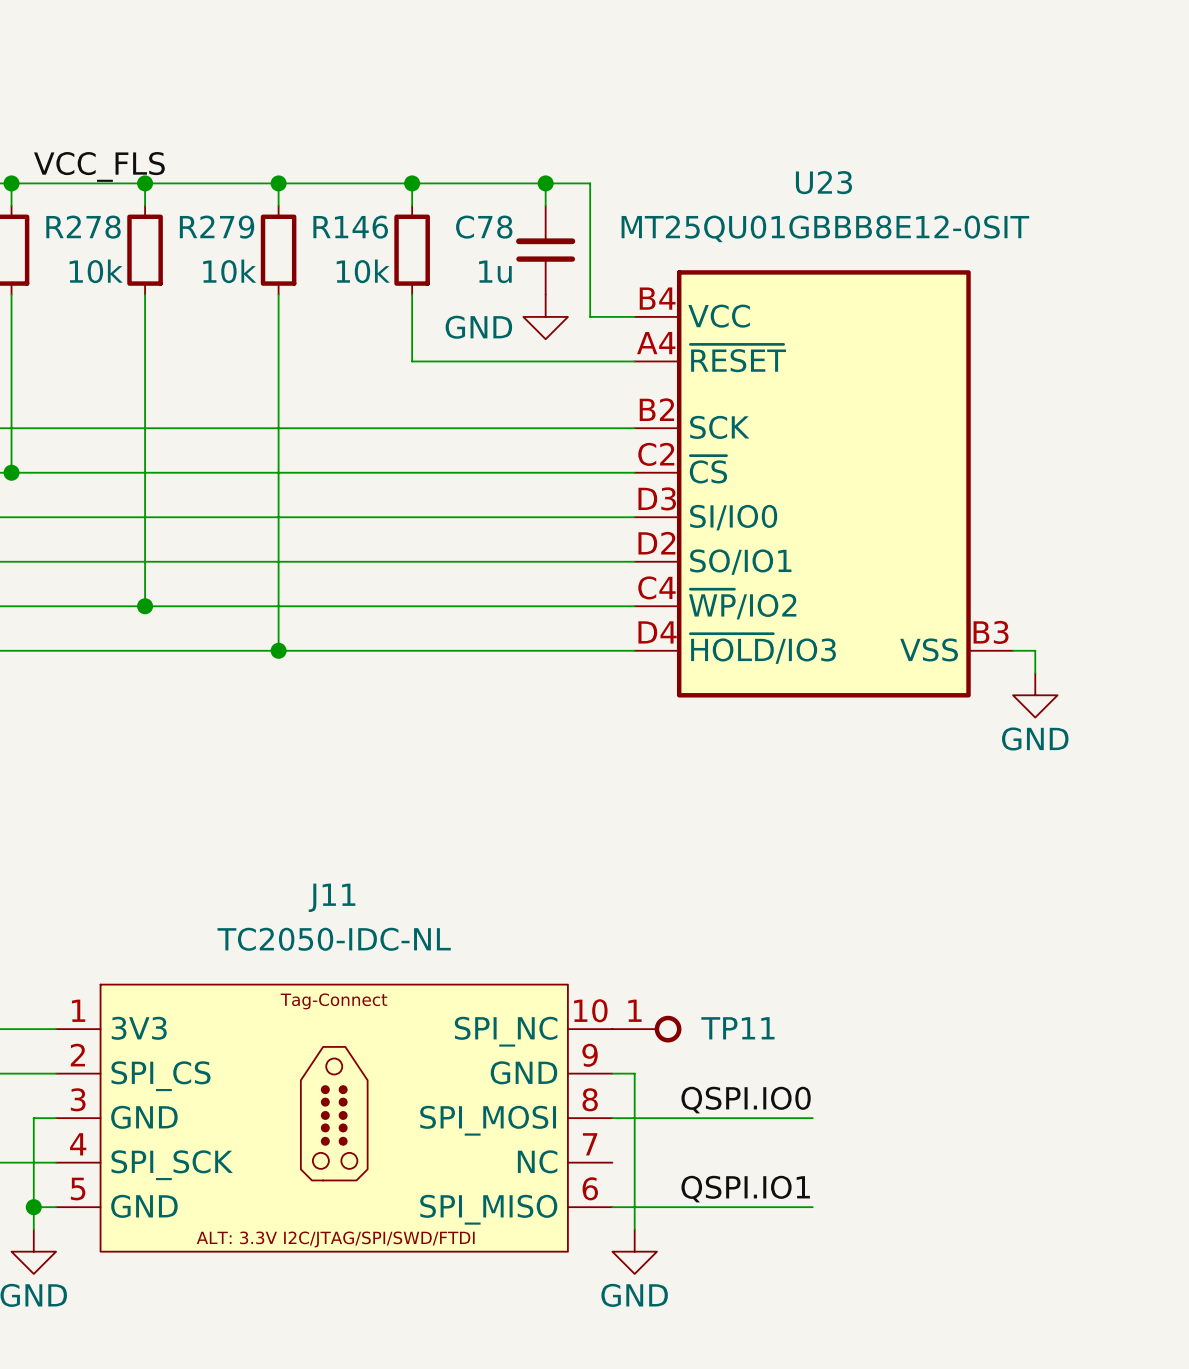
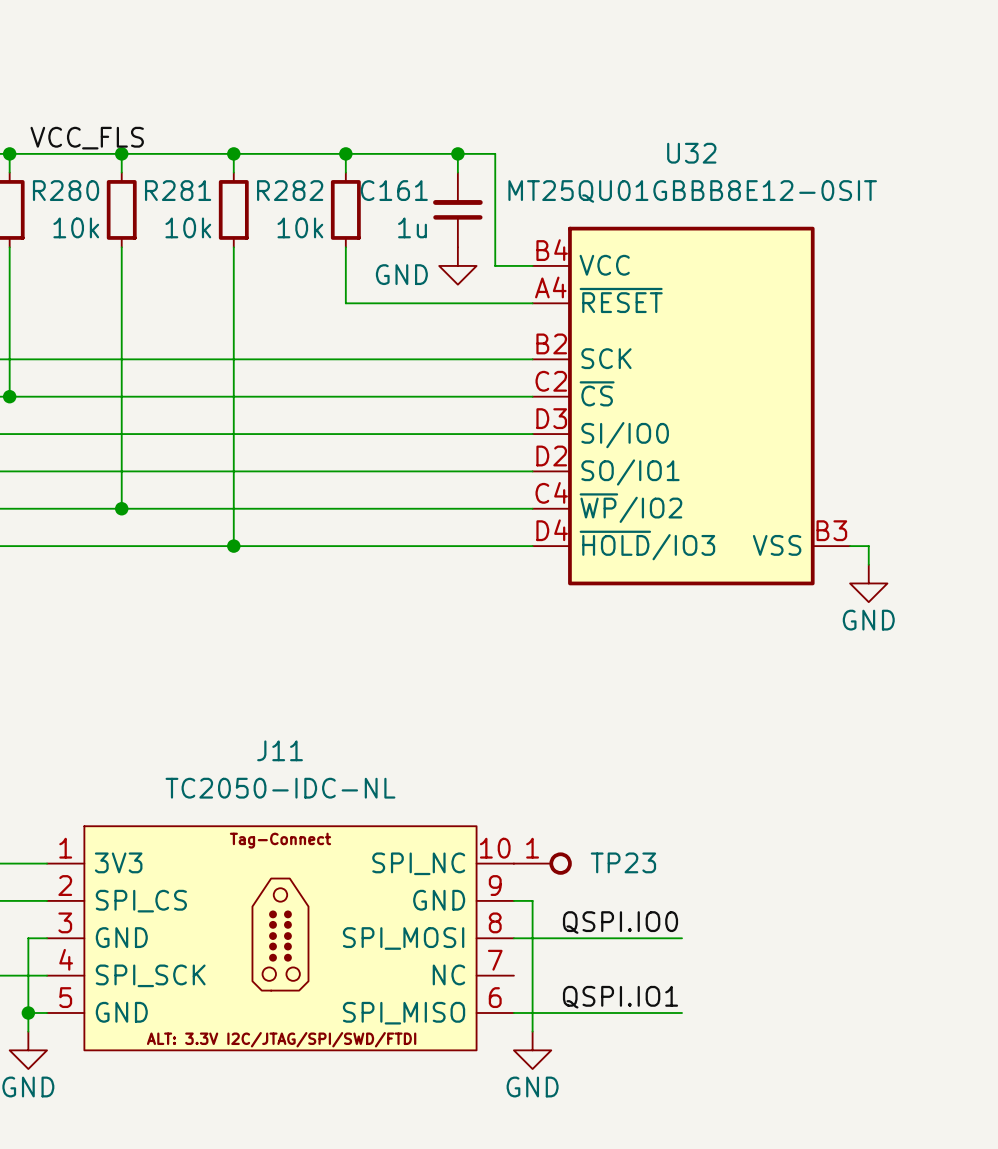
U23 name: U23 (823, 182) -> U32 (691, 153)
R278 name: R278 (83, 227) -> R280 (66, 190)
R279 name: R279 (217, 227) -> R281 (178, 190)
R146 name: R146 (350, 227) -> R282 (290, 190)
C78 name: C78 (484, 227) -> C161 (394, 190)
TP11 name: TP11 (737, 1028) -> TP23 (623, 862)

